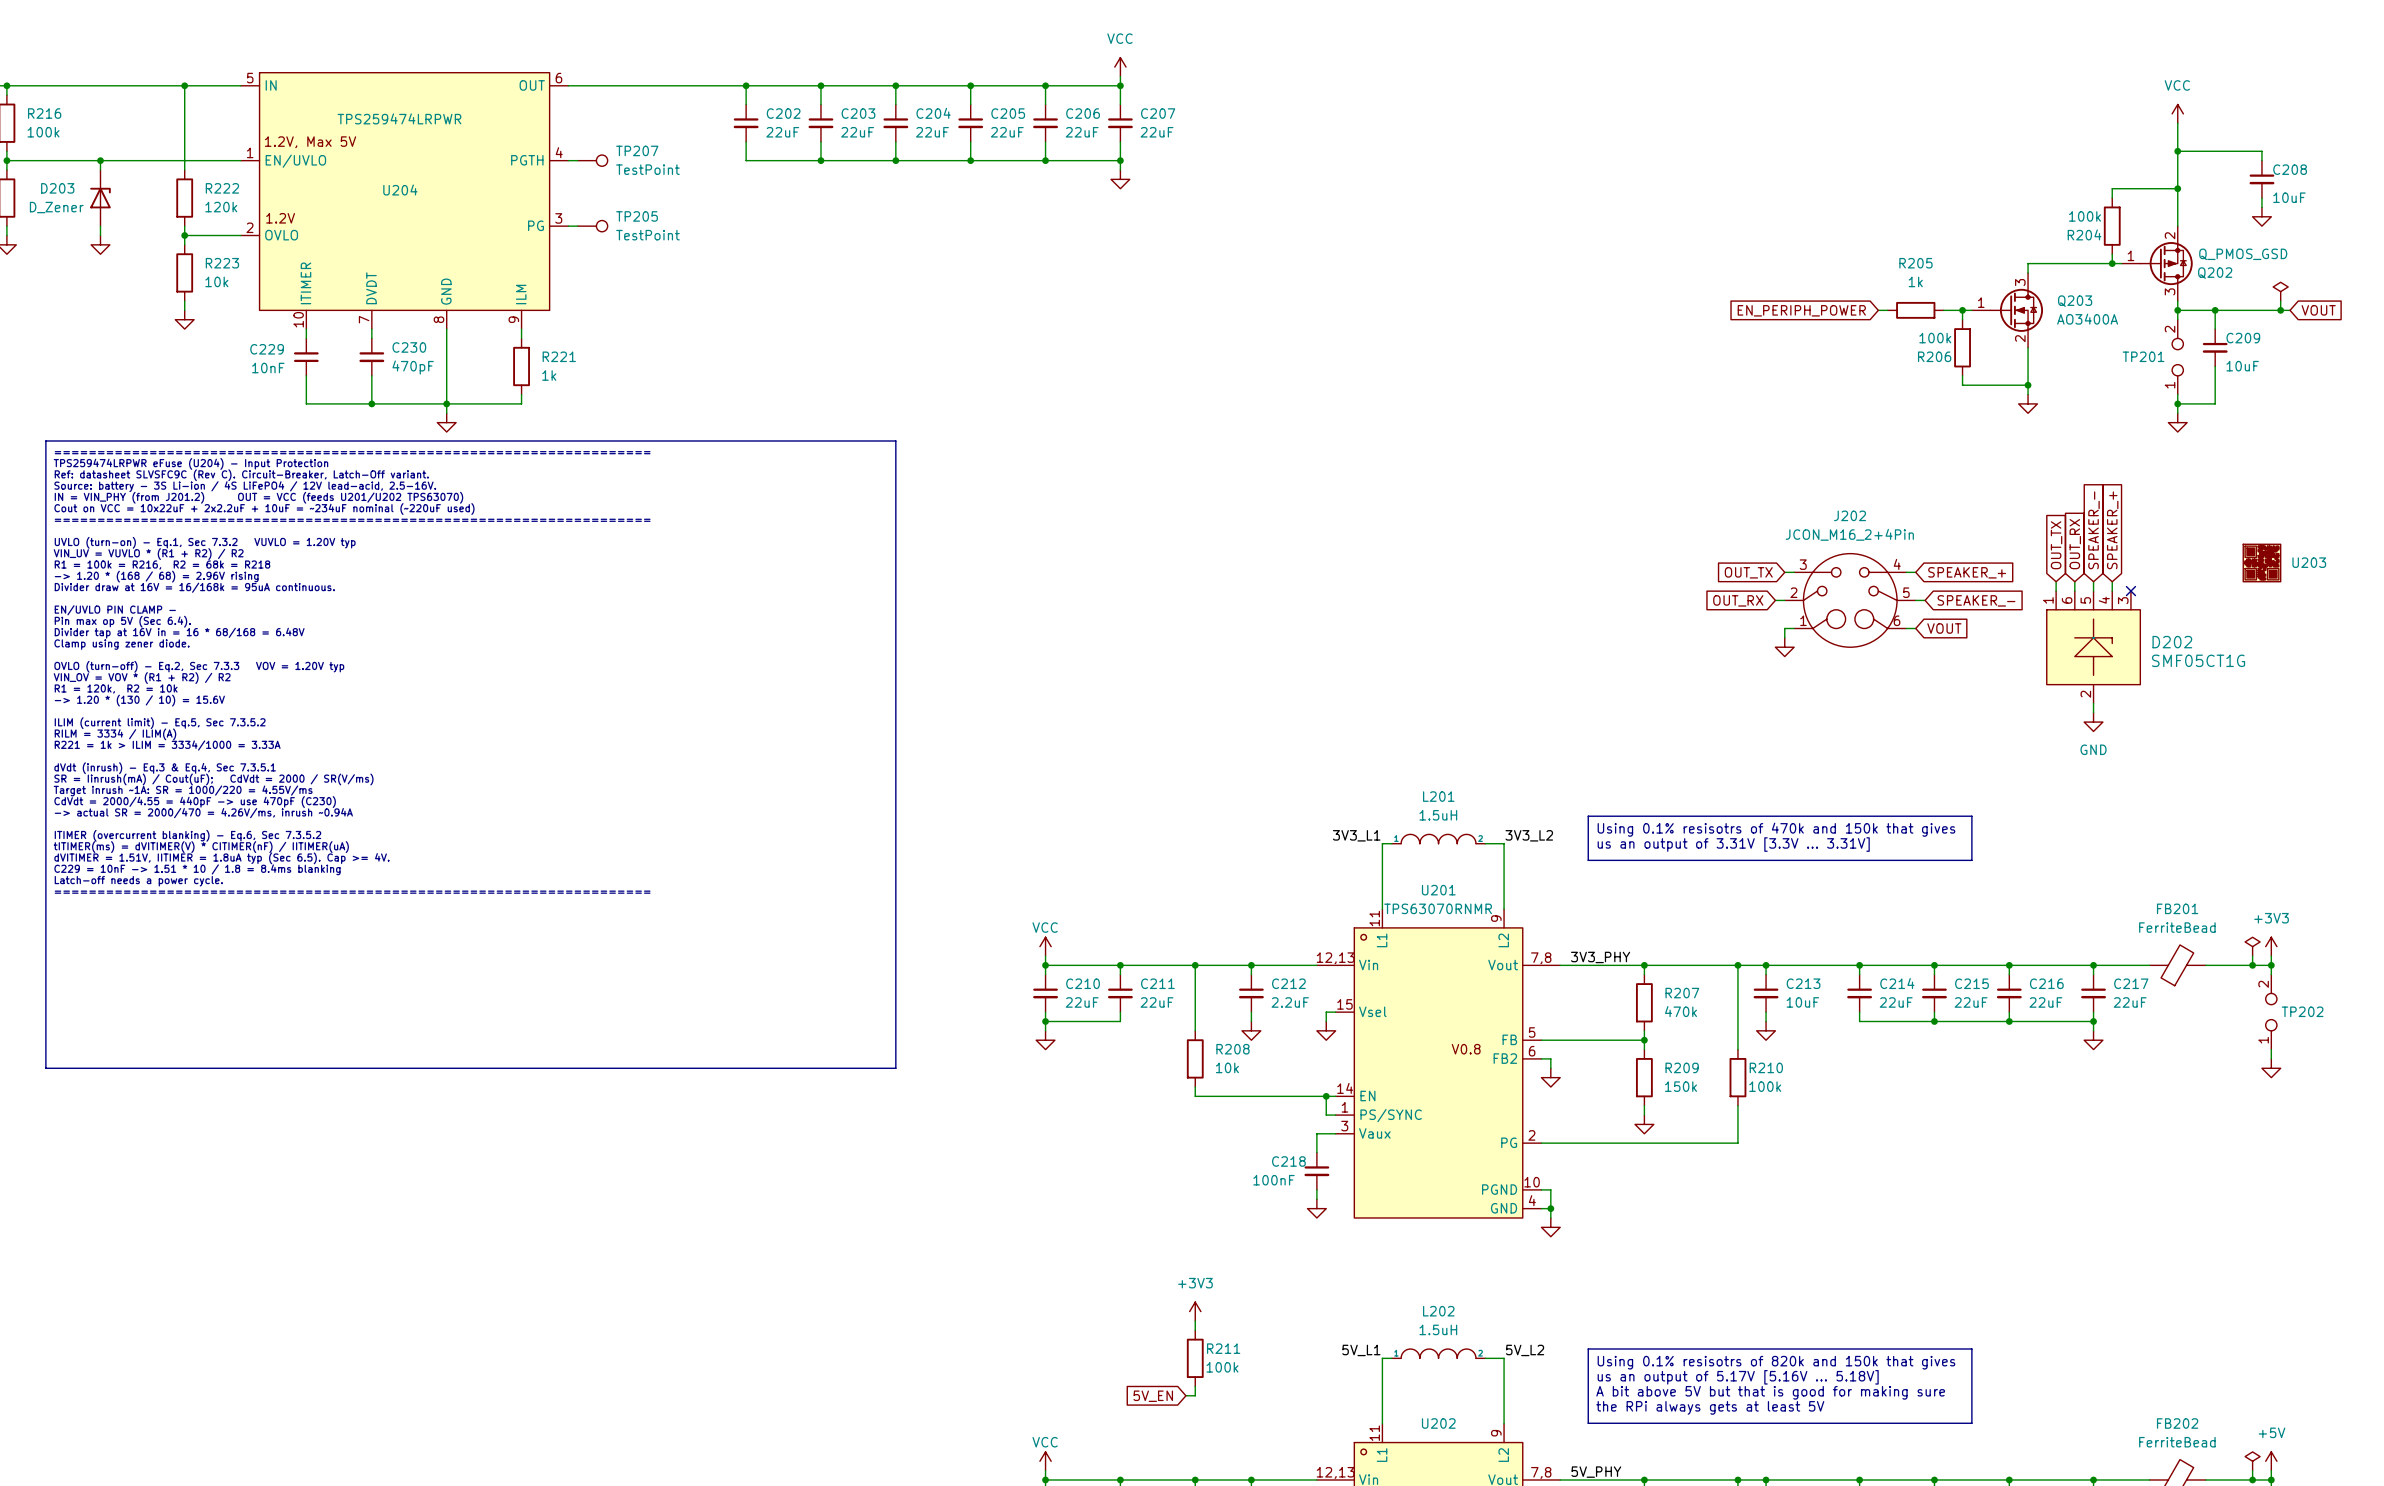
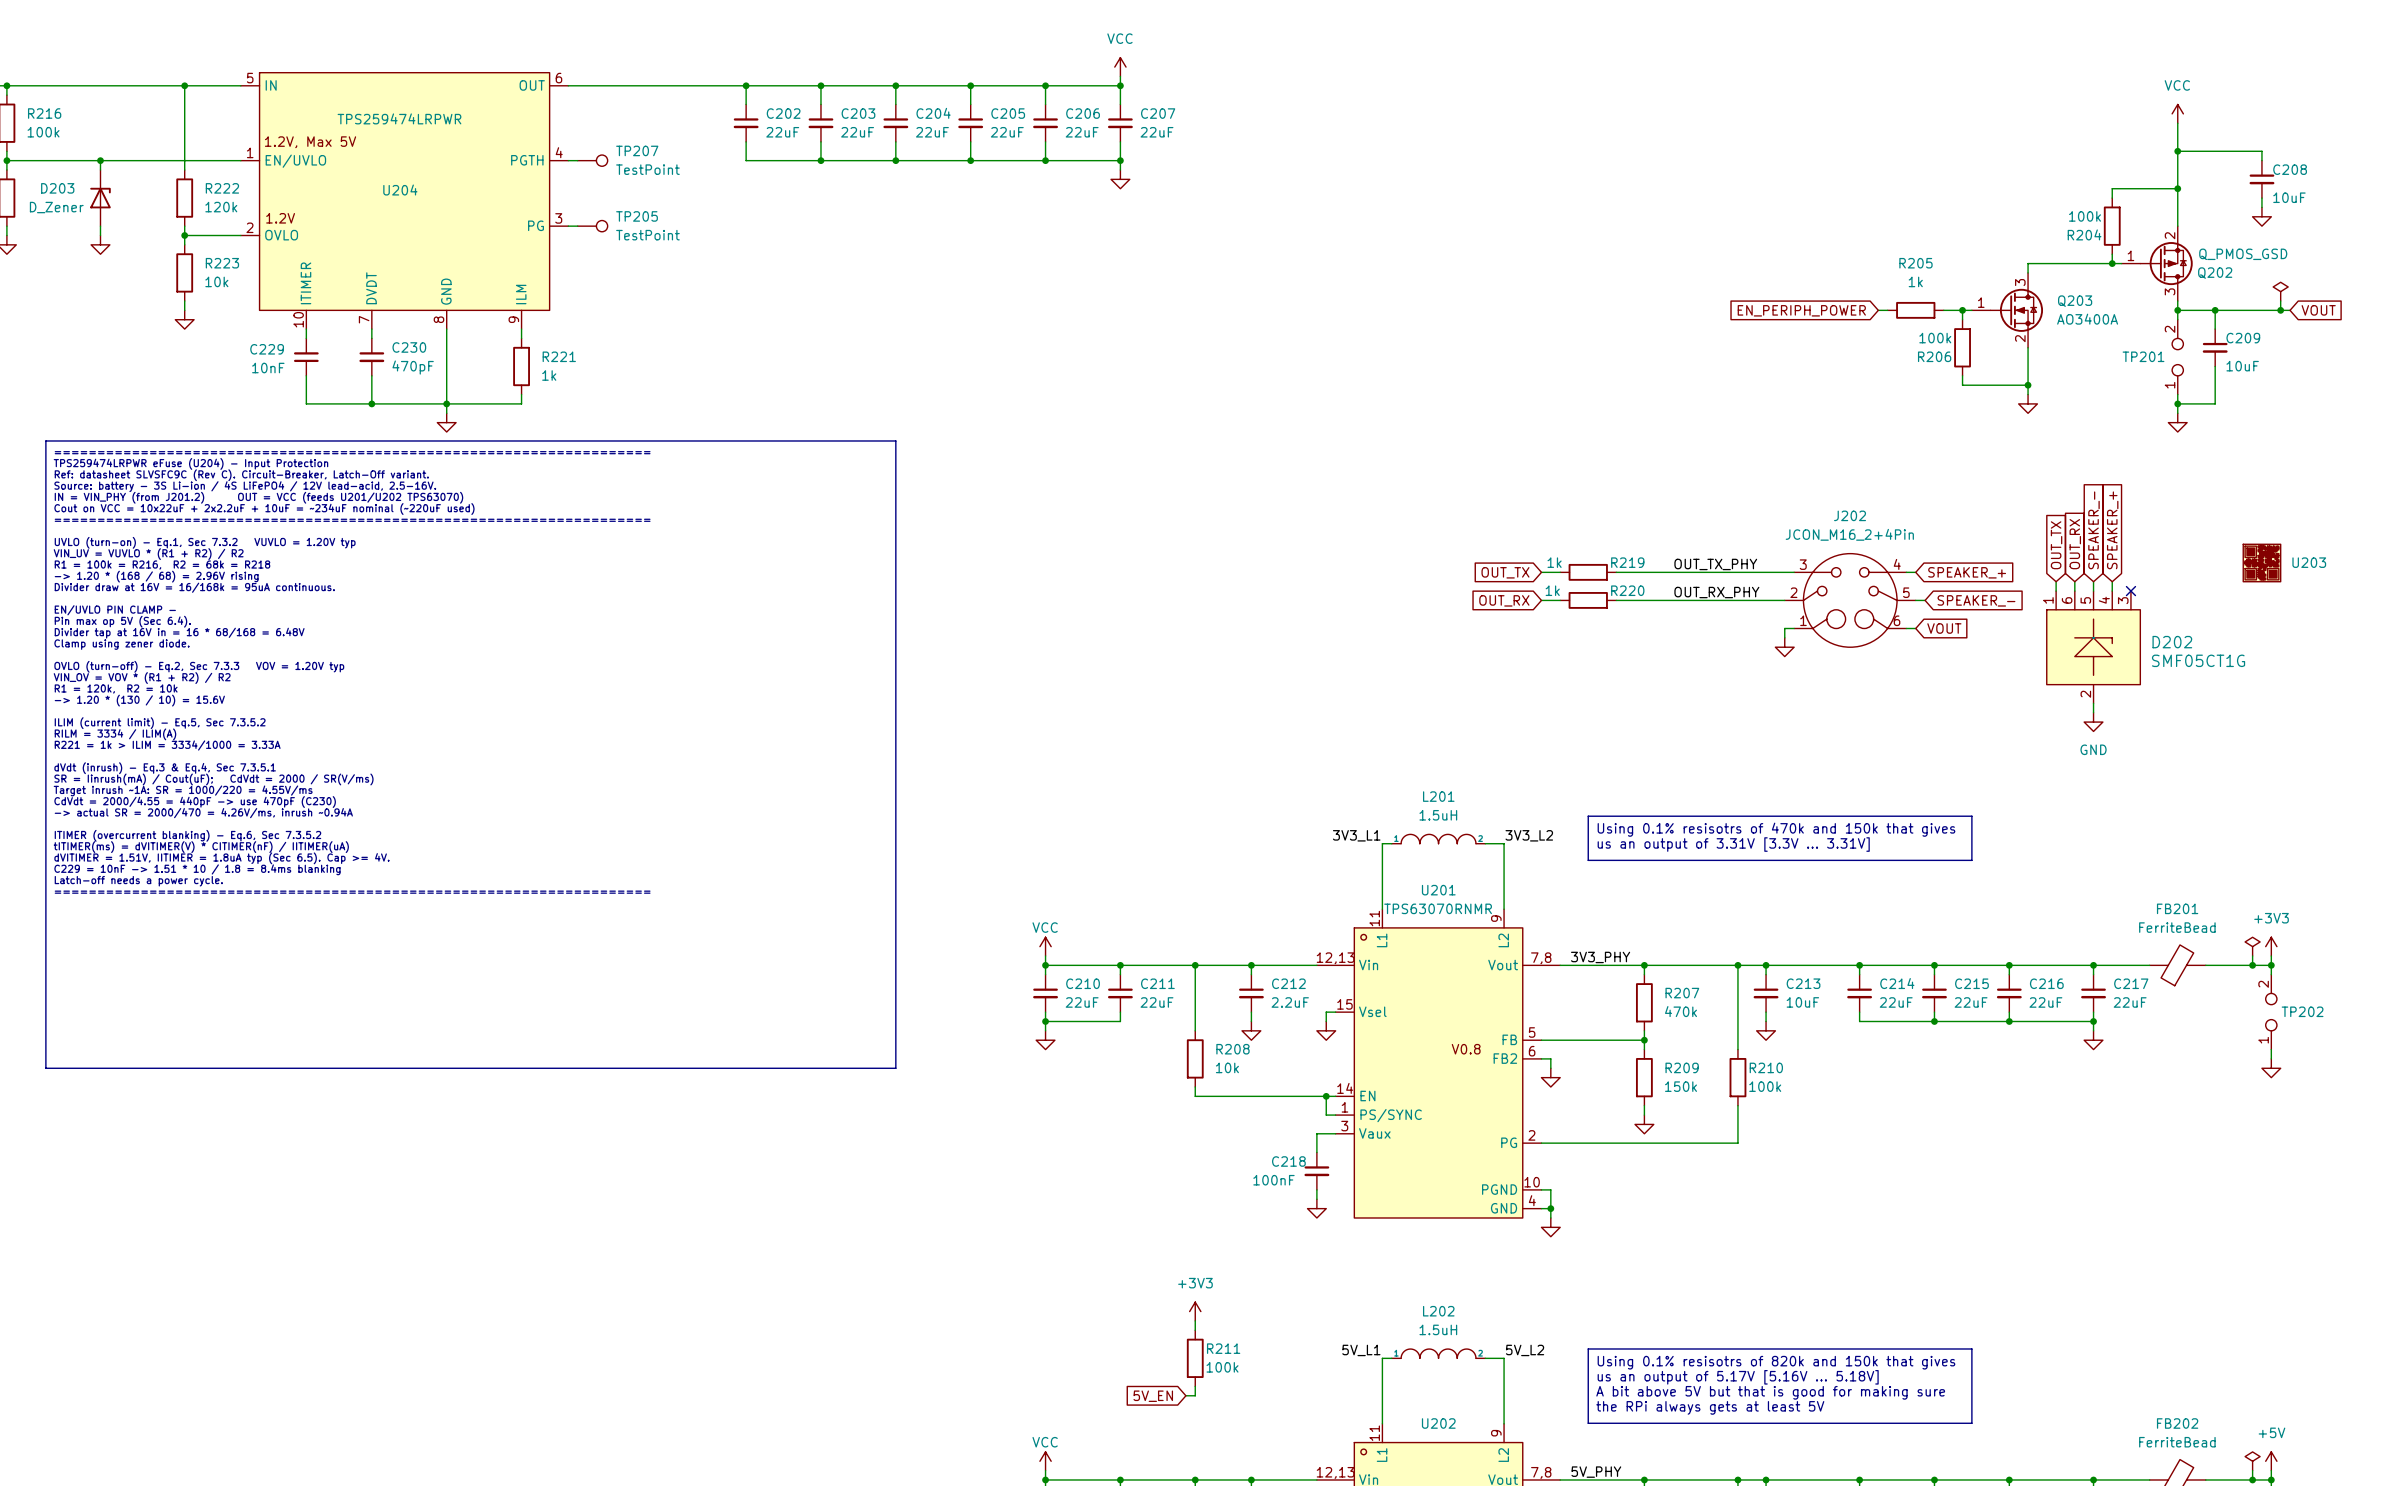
label: none -> OUT_TX_PHY (1715, 564)
global label: none -> OUT_TX (1505, 572)
wire: none -> (1541, 572) (1560, 572)
R219: none -> 1k (1588, 572)
wire: none -> (1616, 572) (1784, 572)
global label: OUT_TX (1748, 572) -> none
label: none -> OUT_RX_PHY (1716, 592)
global label: none -> OUT_RX (1504, 600)
wire: none -> (1541, 600) (1560, 600)
R220: none -> 1k (1588, 600)
wire: none -> (1616, 600) (1775, 600)
global label: OUT_RX (1738, 600) -> none

